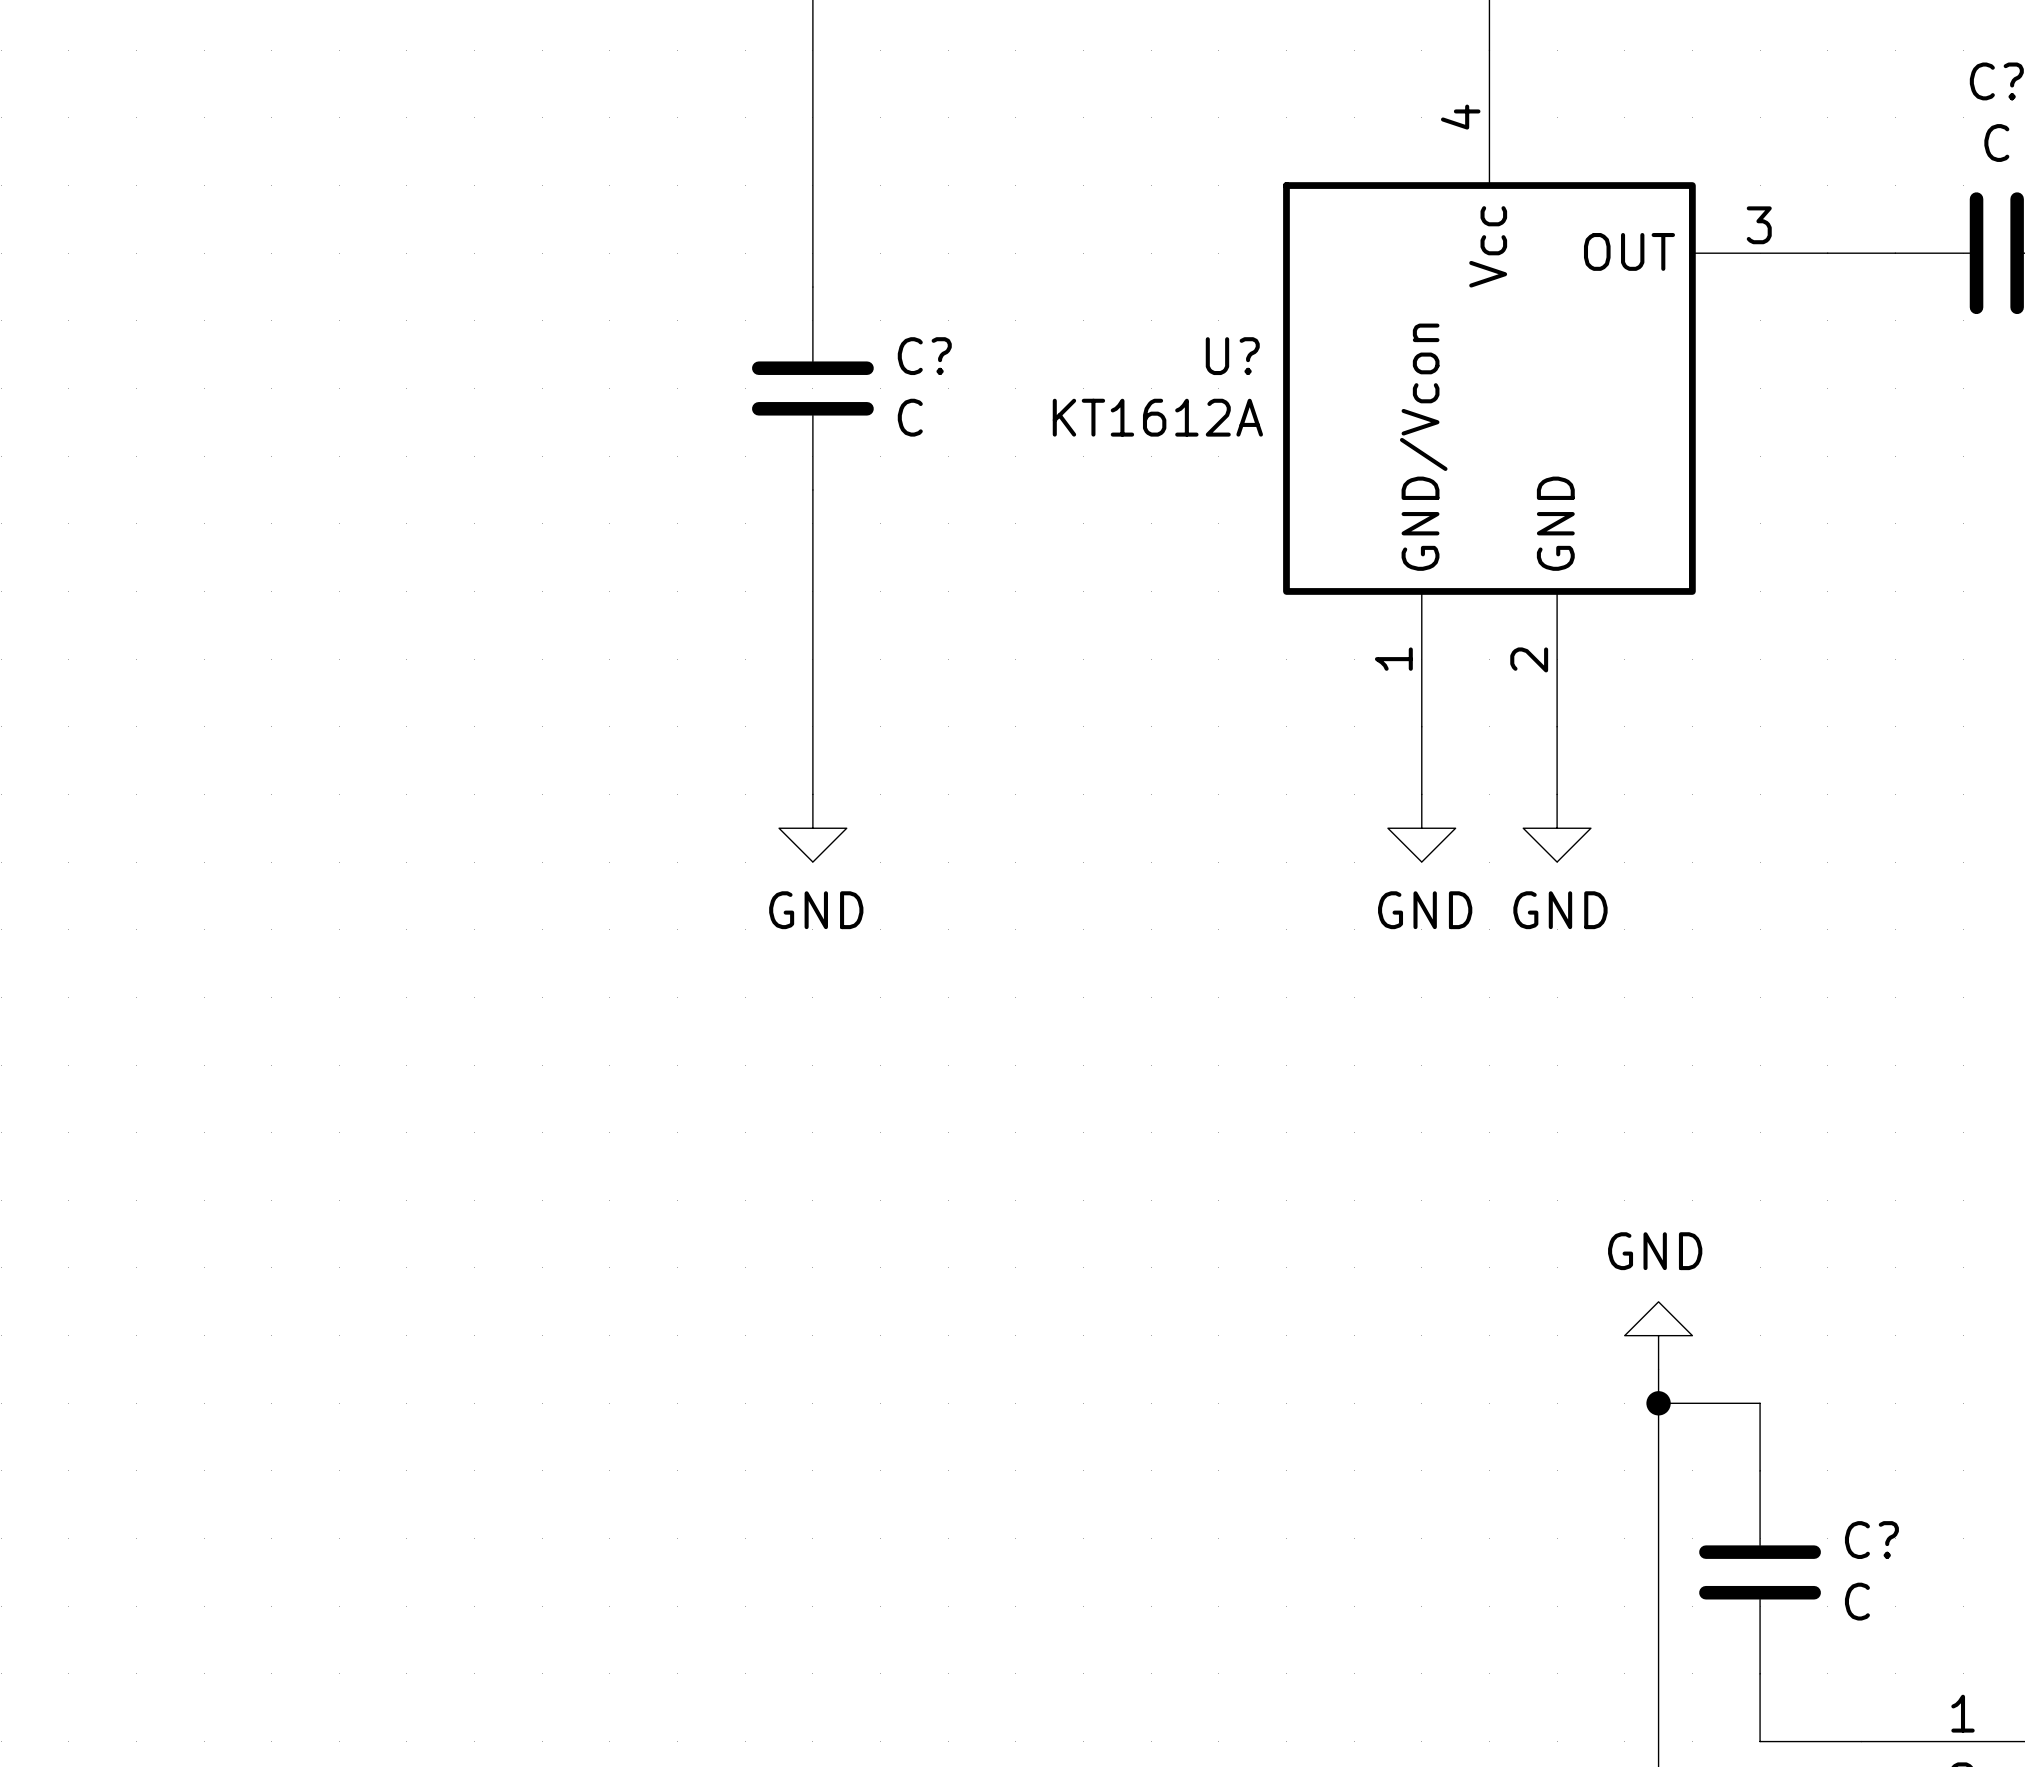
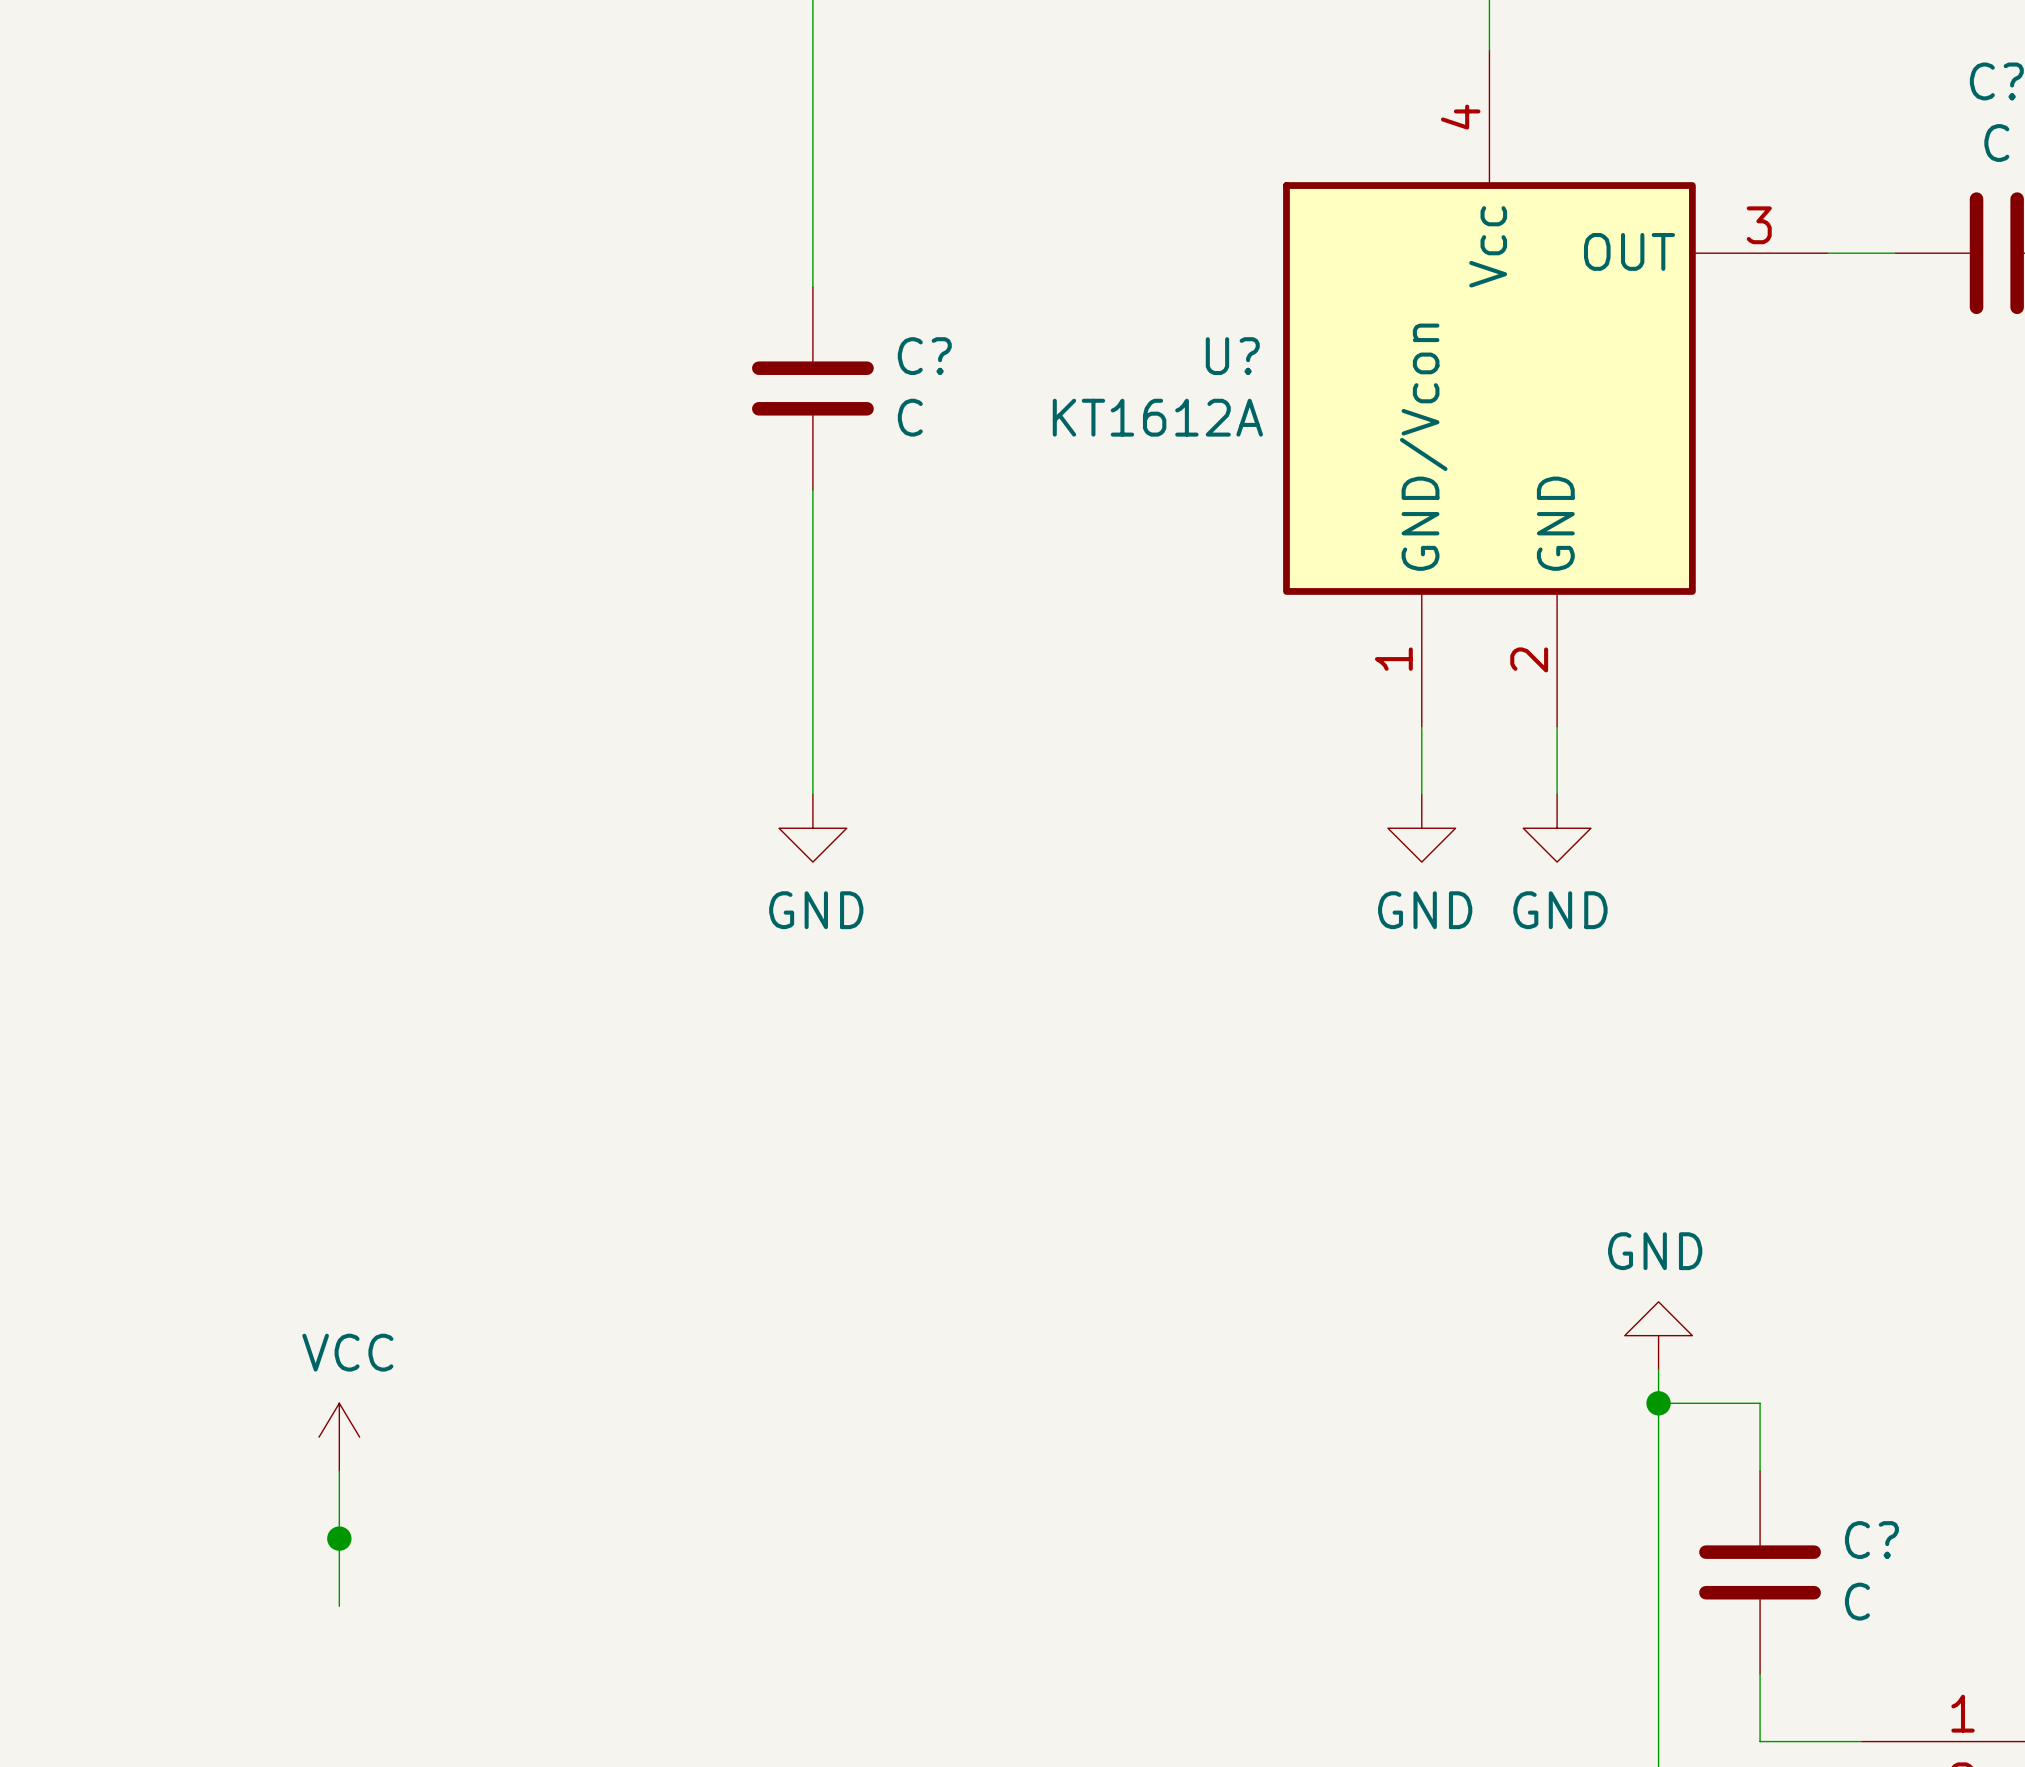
power symbol: none -> VCC (339, 1437)
wire: none -> (339, 1470) (339, 1606)
junction: none -> (339, 1538)

